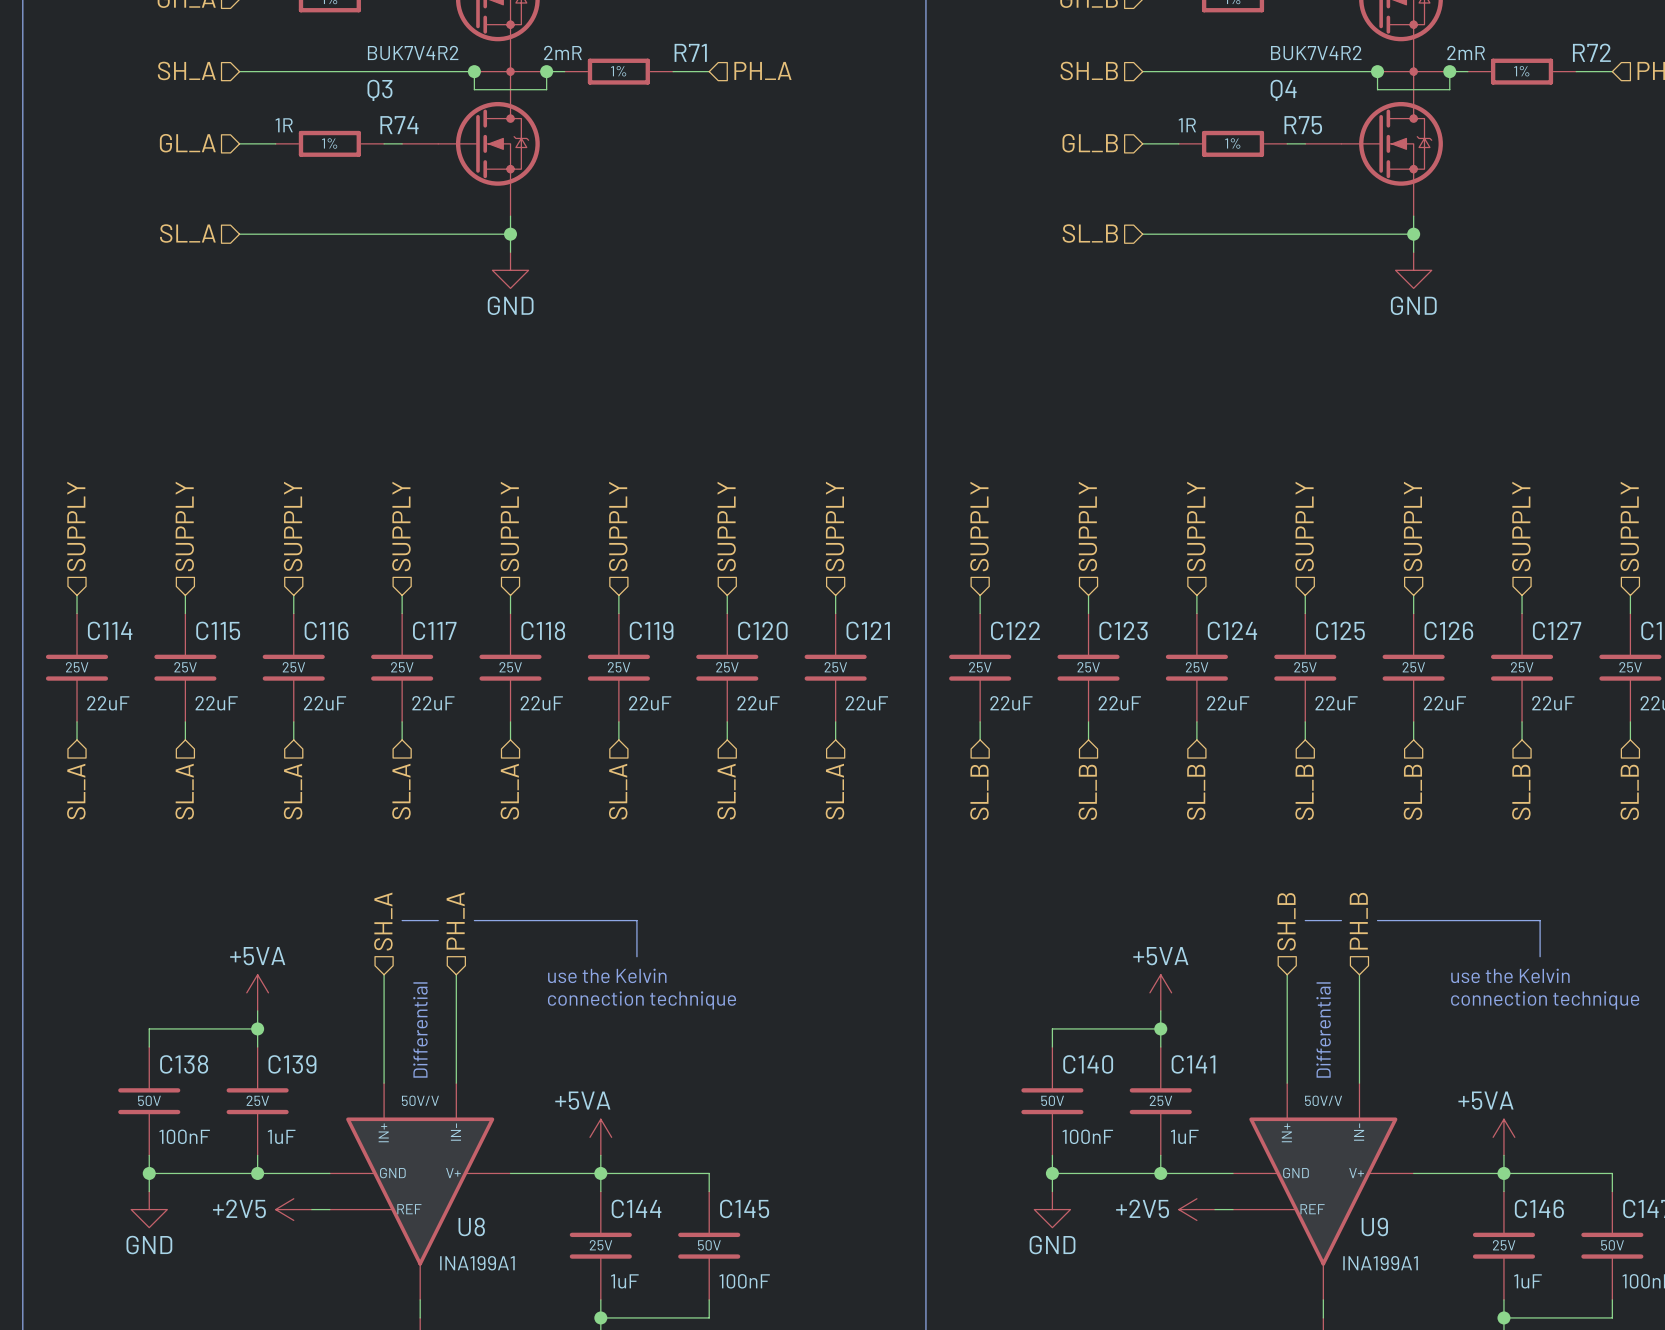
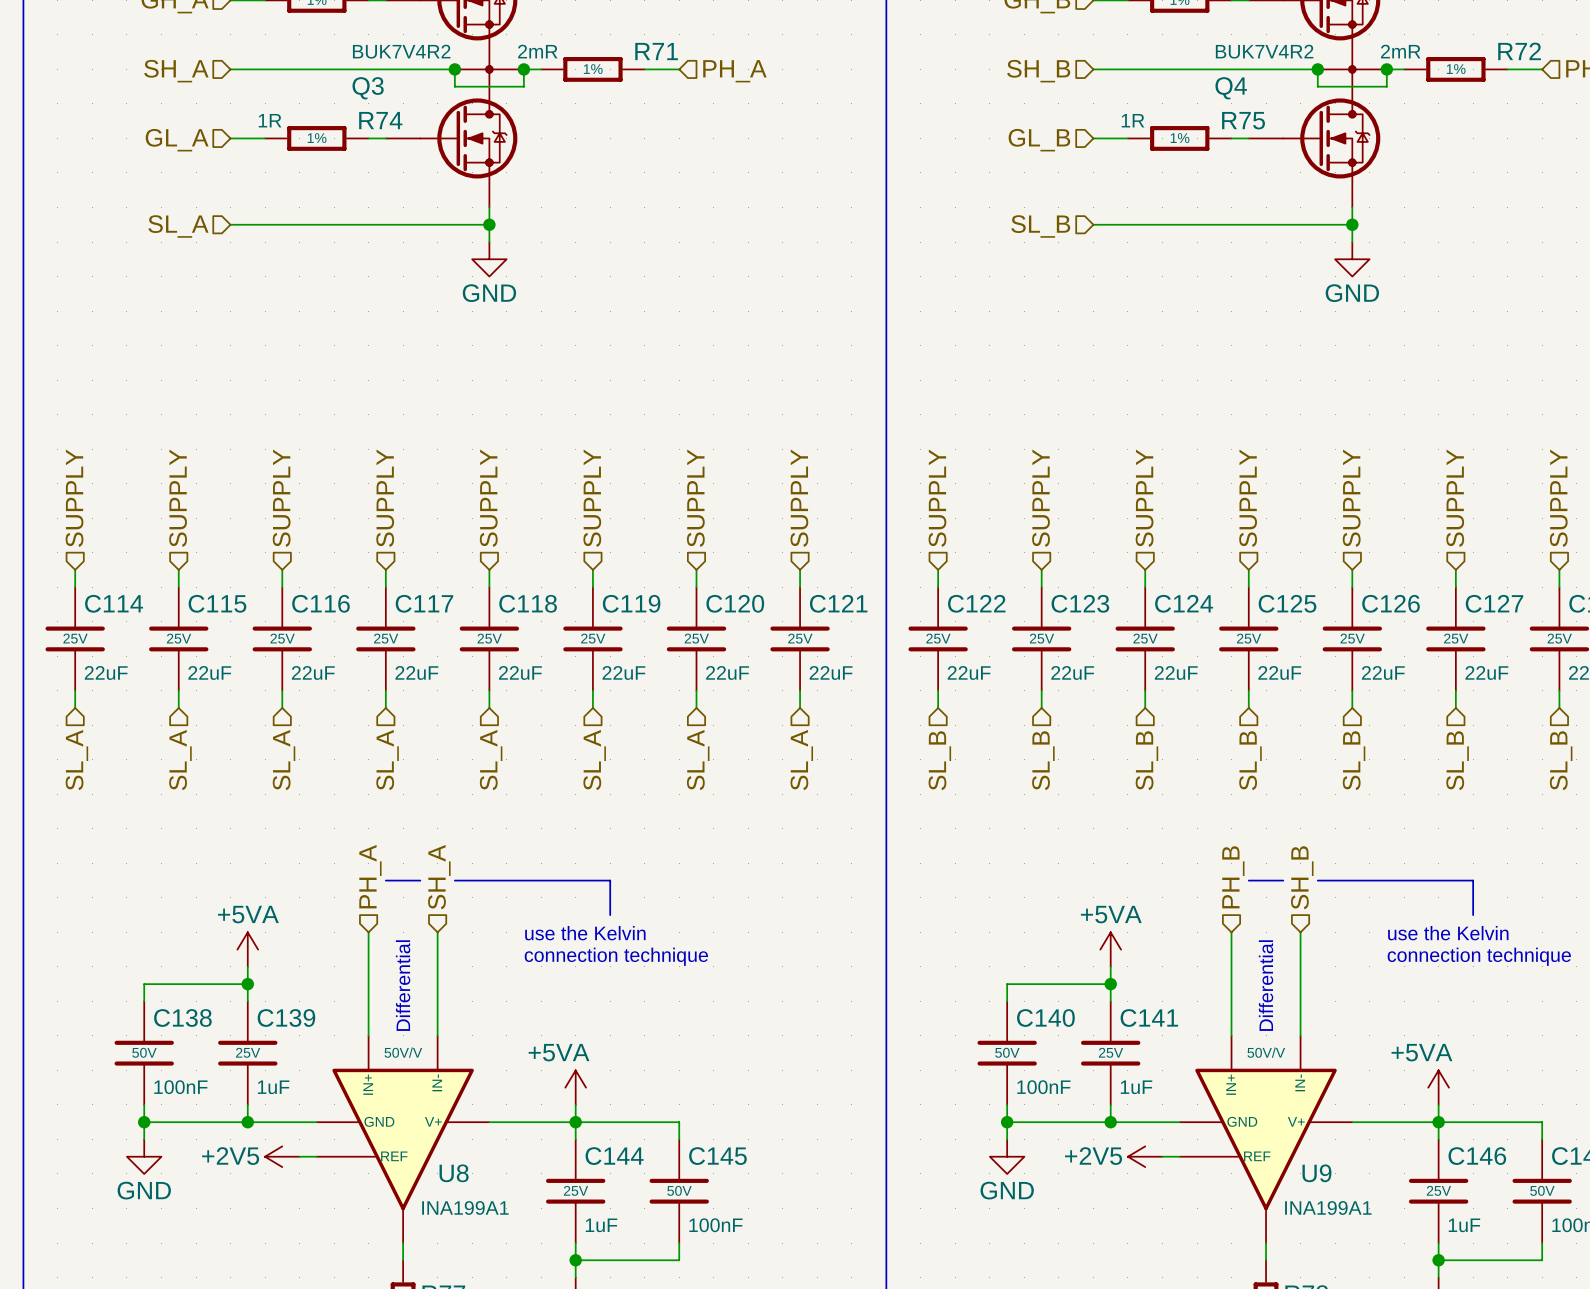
hierarchical label: SH_A (383, 921) -> PH_A (370, 876)
hierarchical label: PH_A (455, 921) -> SH_A (439, 877)
hierarchical label: SH_B (1286, 921) -> PH_B (1233, 877)
hierarchical label: PH_B (1358, 921) -> SH_B (1302, 877)

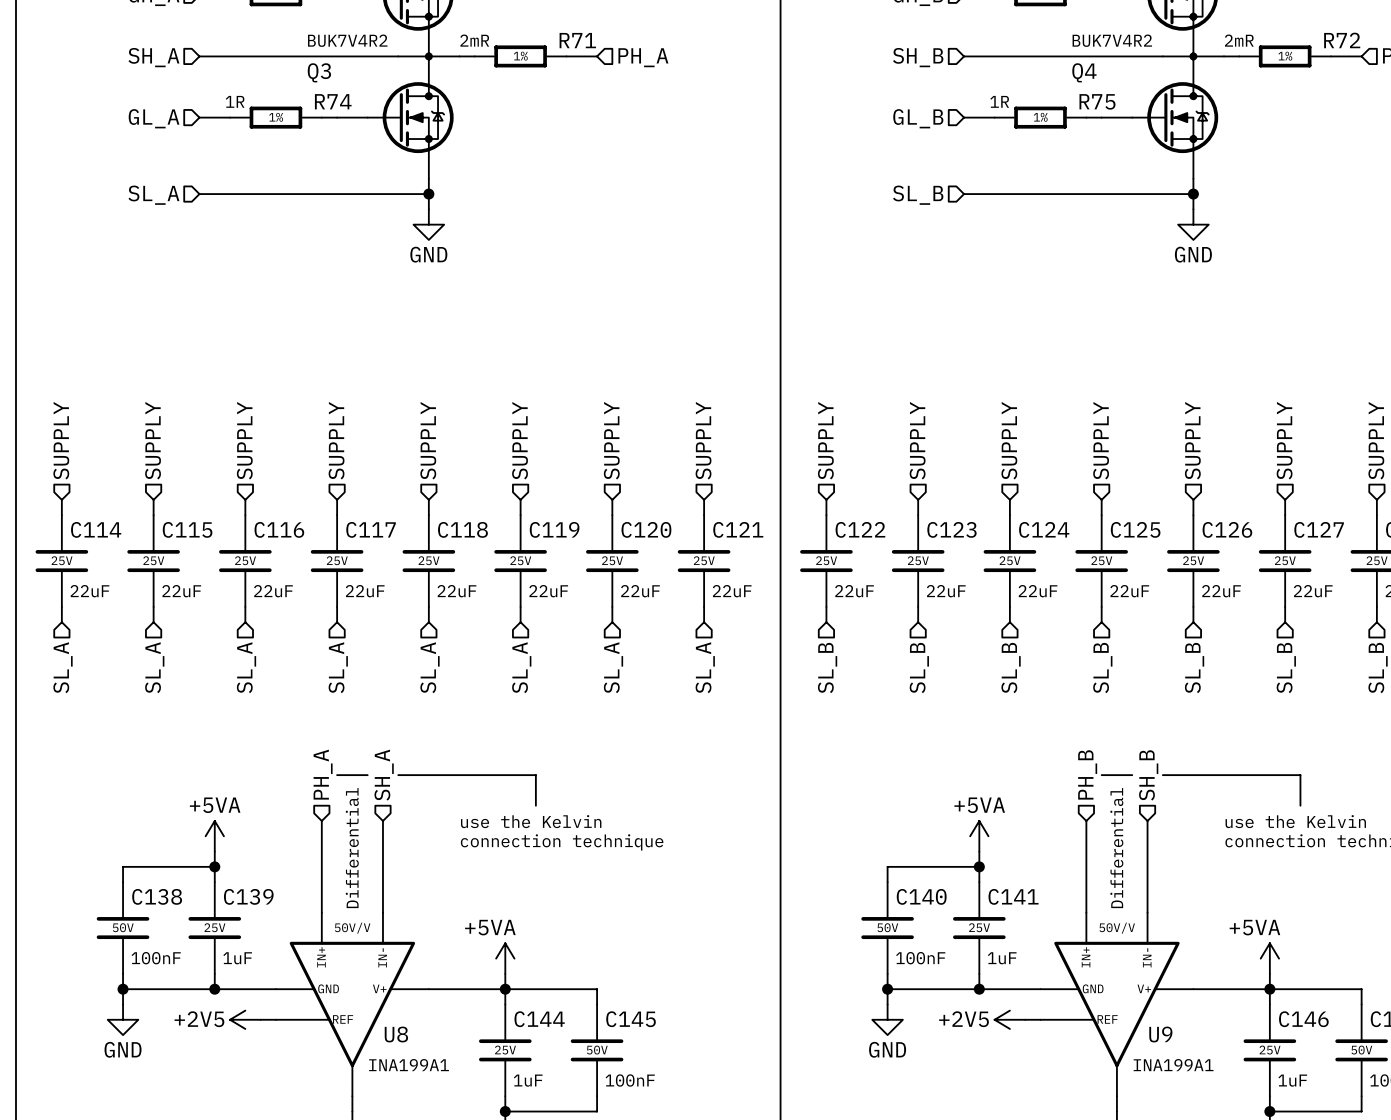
wire: (454, 69) (454, 86) (523, 86) (523, 69) -> none
junction: (454, 69) -> none
junction: (523, 69) -> none
wire: (1317, 69) (1317, 86) (1386, 86) (1386, 69) -> none
junction: (1317, 69) -> none
junction: (1386, 69) -> none

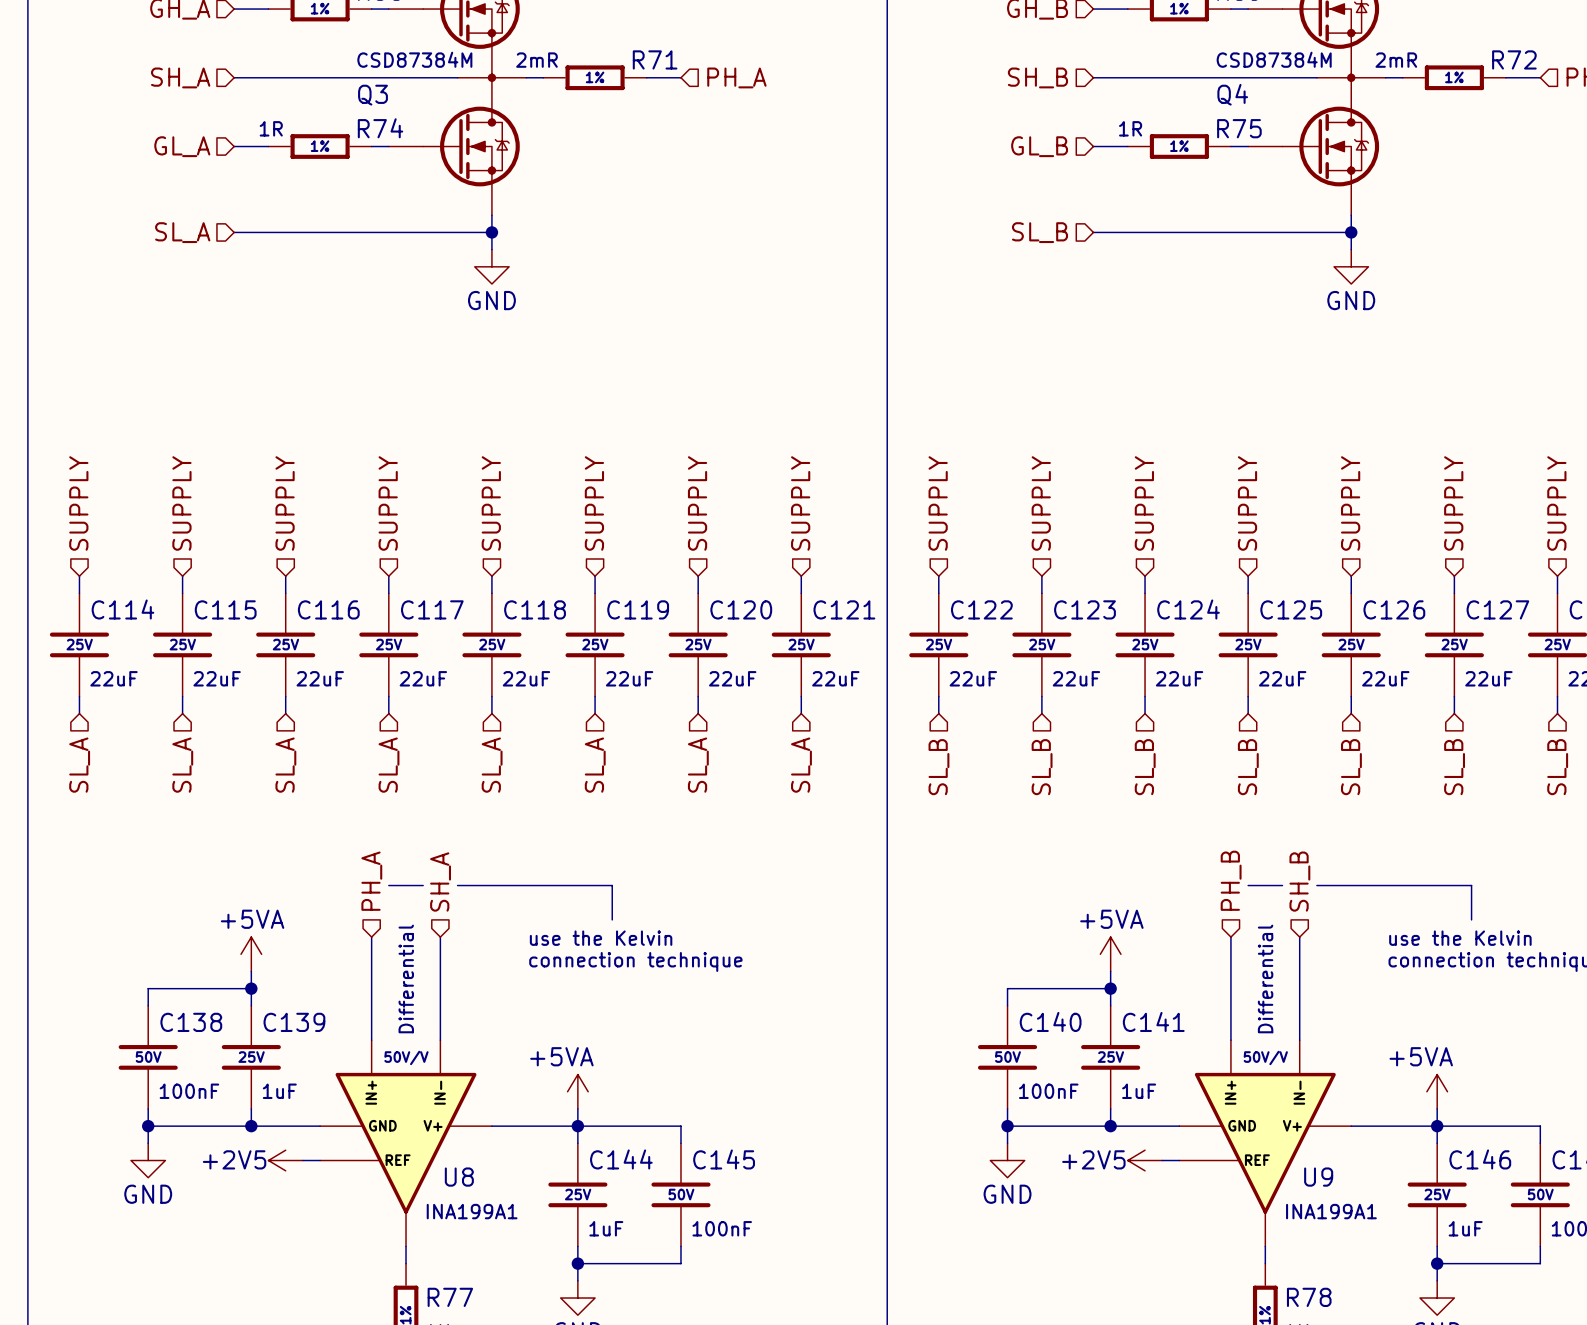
Q3 value: BUK7V4R2 (347, 40) -> CSD87384M (414, 59)
Q4 value: BUK7V4R2 (1112, 40) -> CSD87384M (1274, 59)

